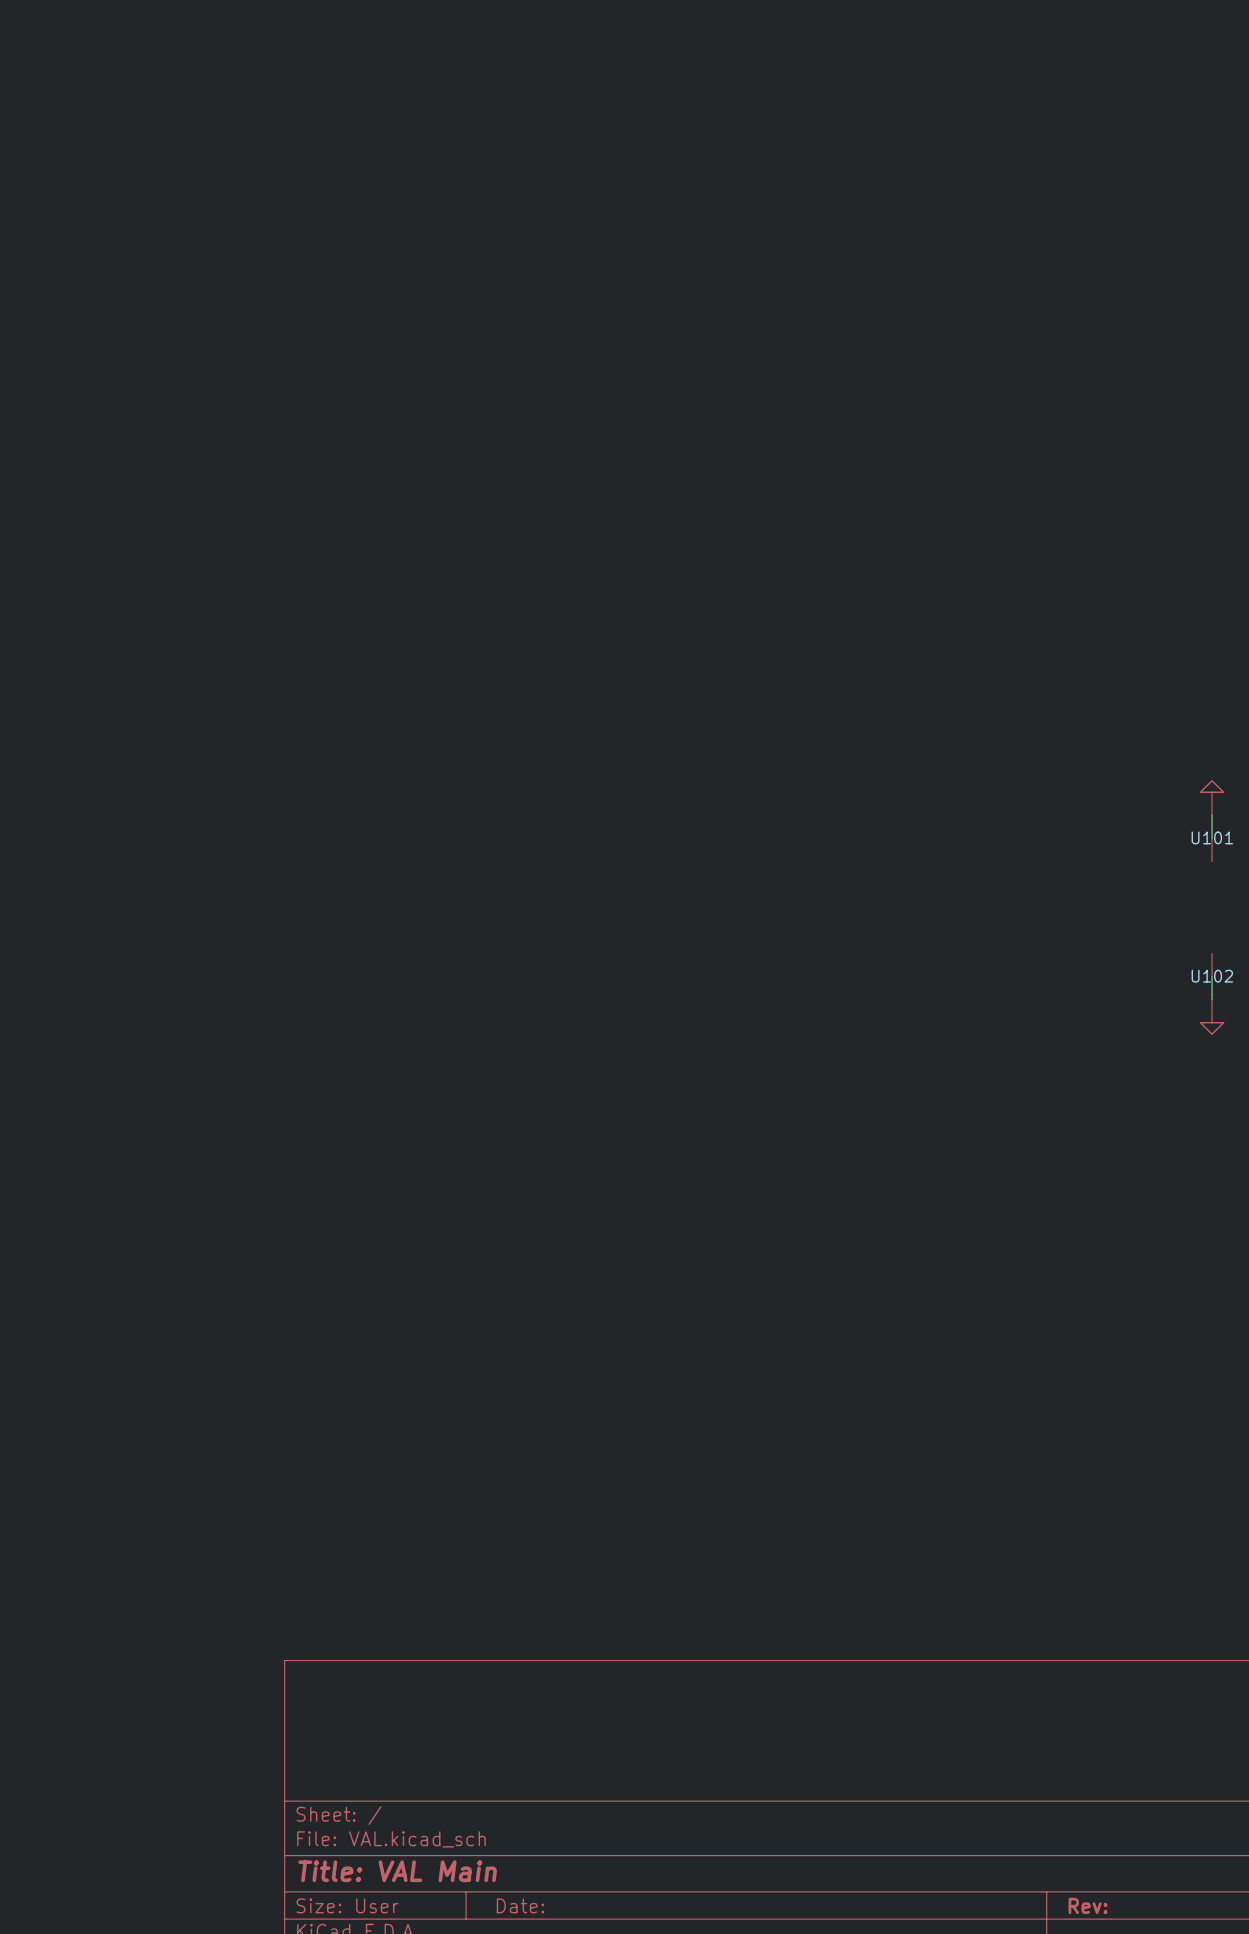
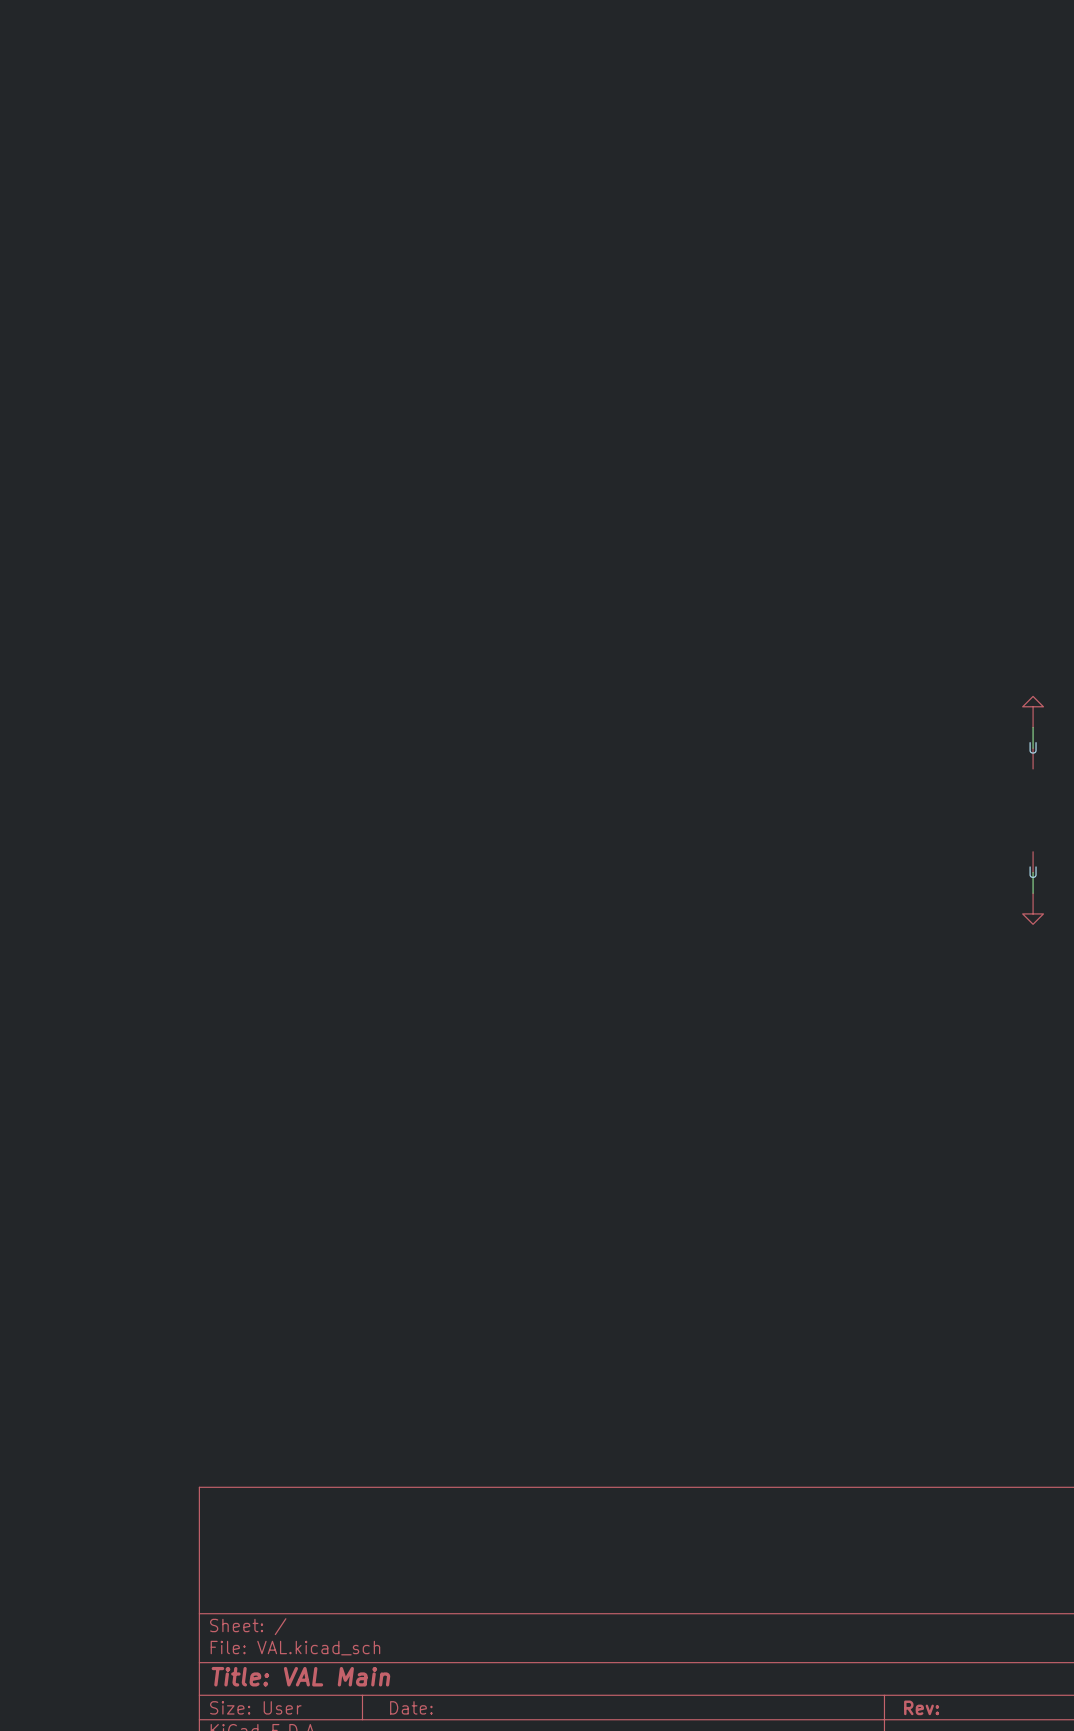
U101 name: U101 (1212, 837) -> U (1033, 747)
U102 name: U102 (1212, 976) -> U (1033, 872)

